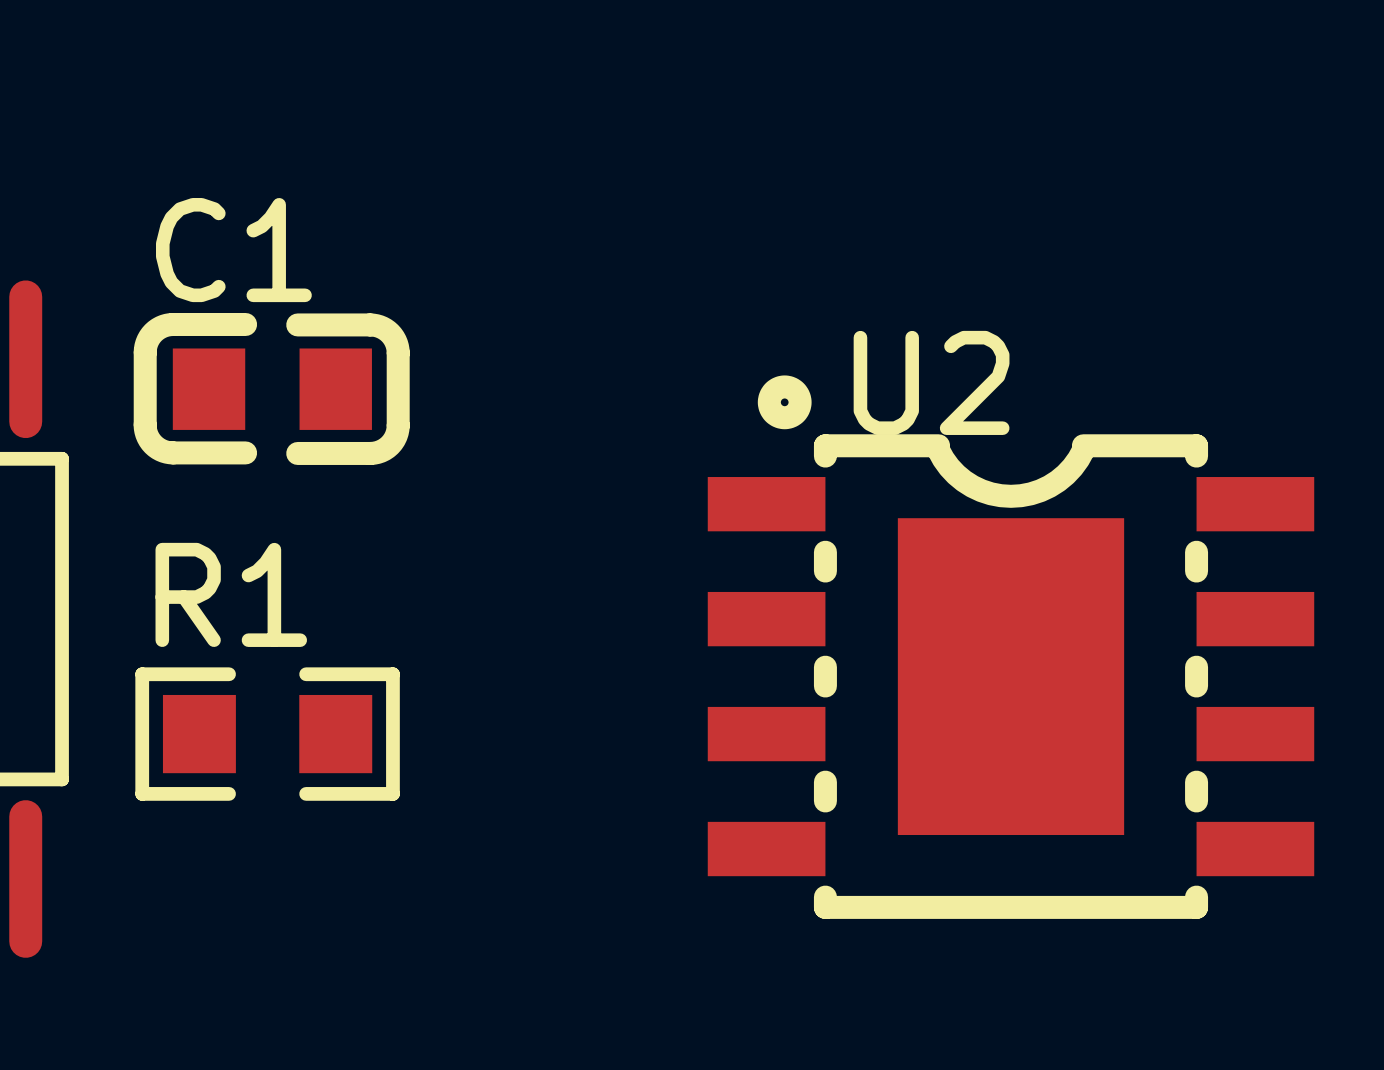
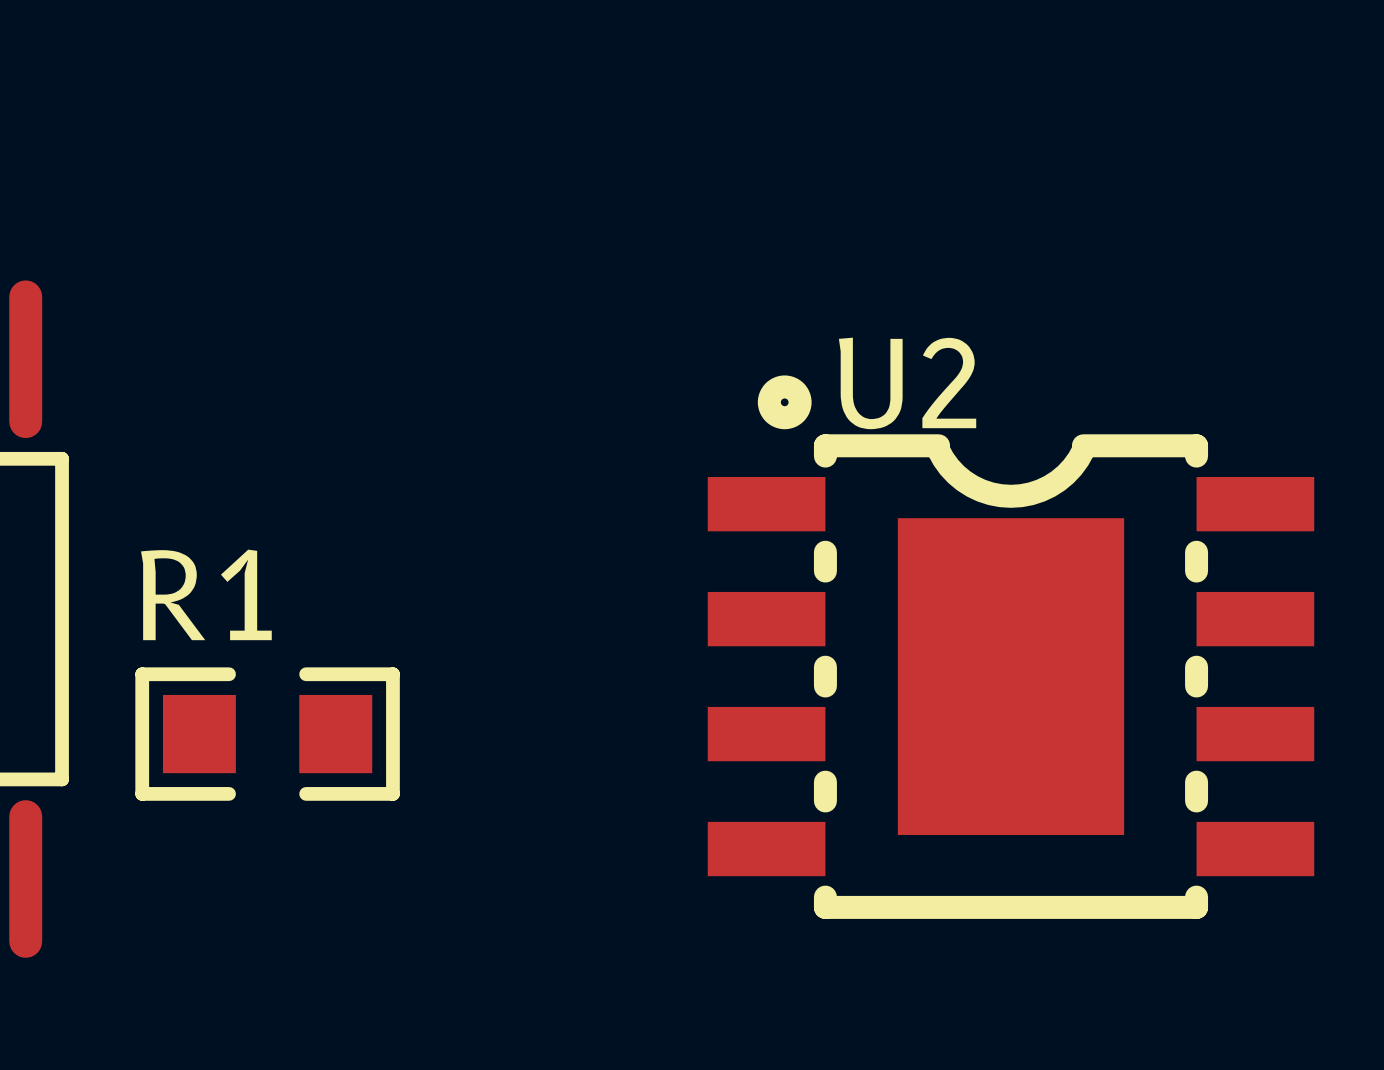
C1: (271, 388) -> none

